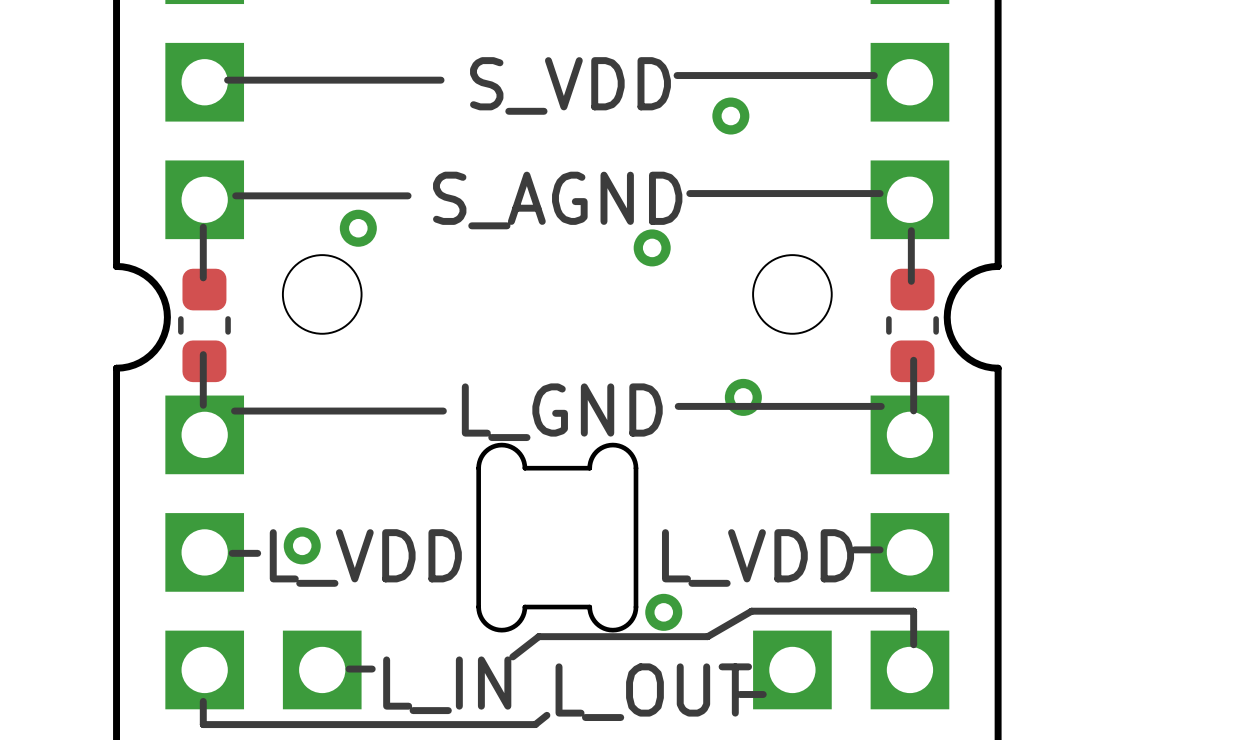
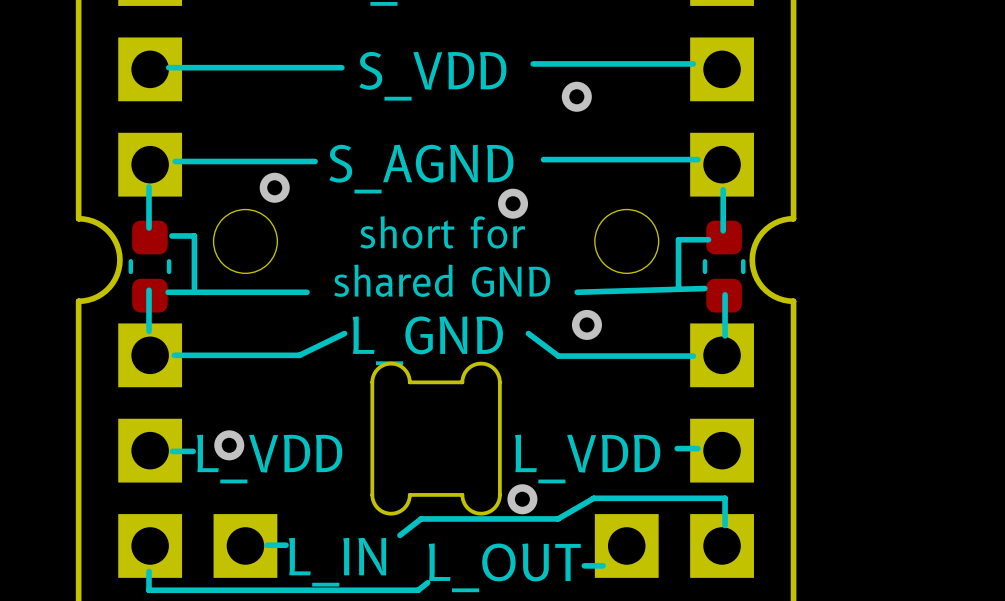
text: none -> short for (442, 232)
line: none -> (171, 235) (194, 235) (194, 288)
line: none -> (708, 239) (678, 239) (678, 288)
text: none -> shared GND (442, 280)
line: none -> (704, 288) (577, 292)
line: none -> (168, 292) (307, 292)
line: (678, 406) (881, 406) -> none
line: none -> (344, 333) (299, 355) (174, 355)
line: none -> (528, 333) (558, 356) (693, 356)
line: (234, 411) (443, 411) -> none

